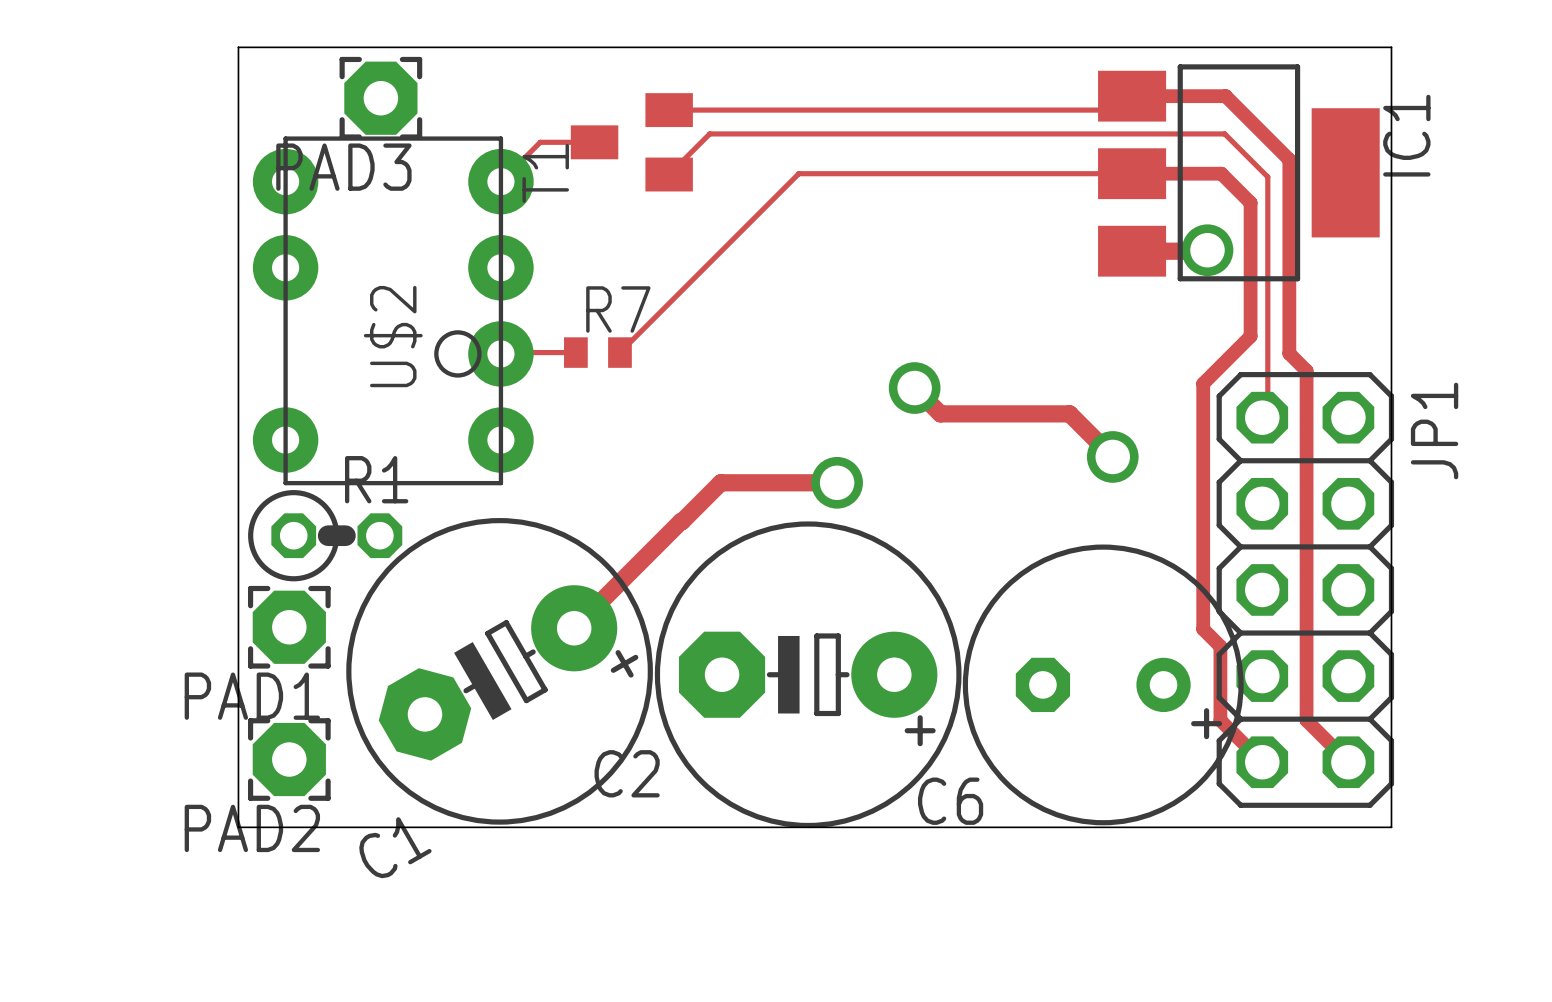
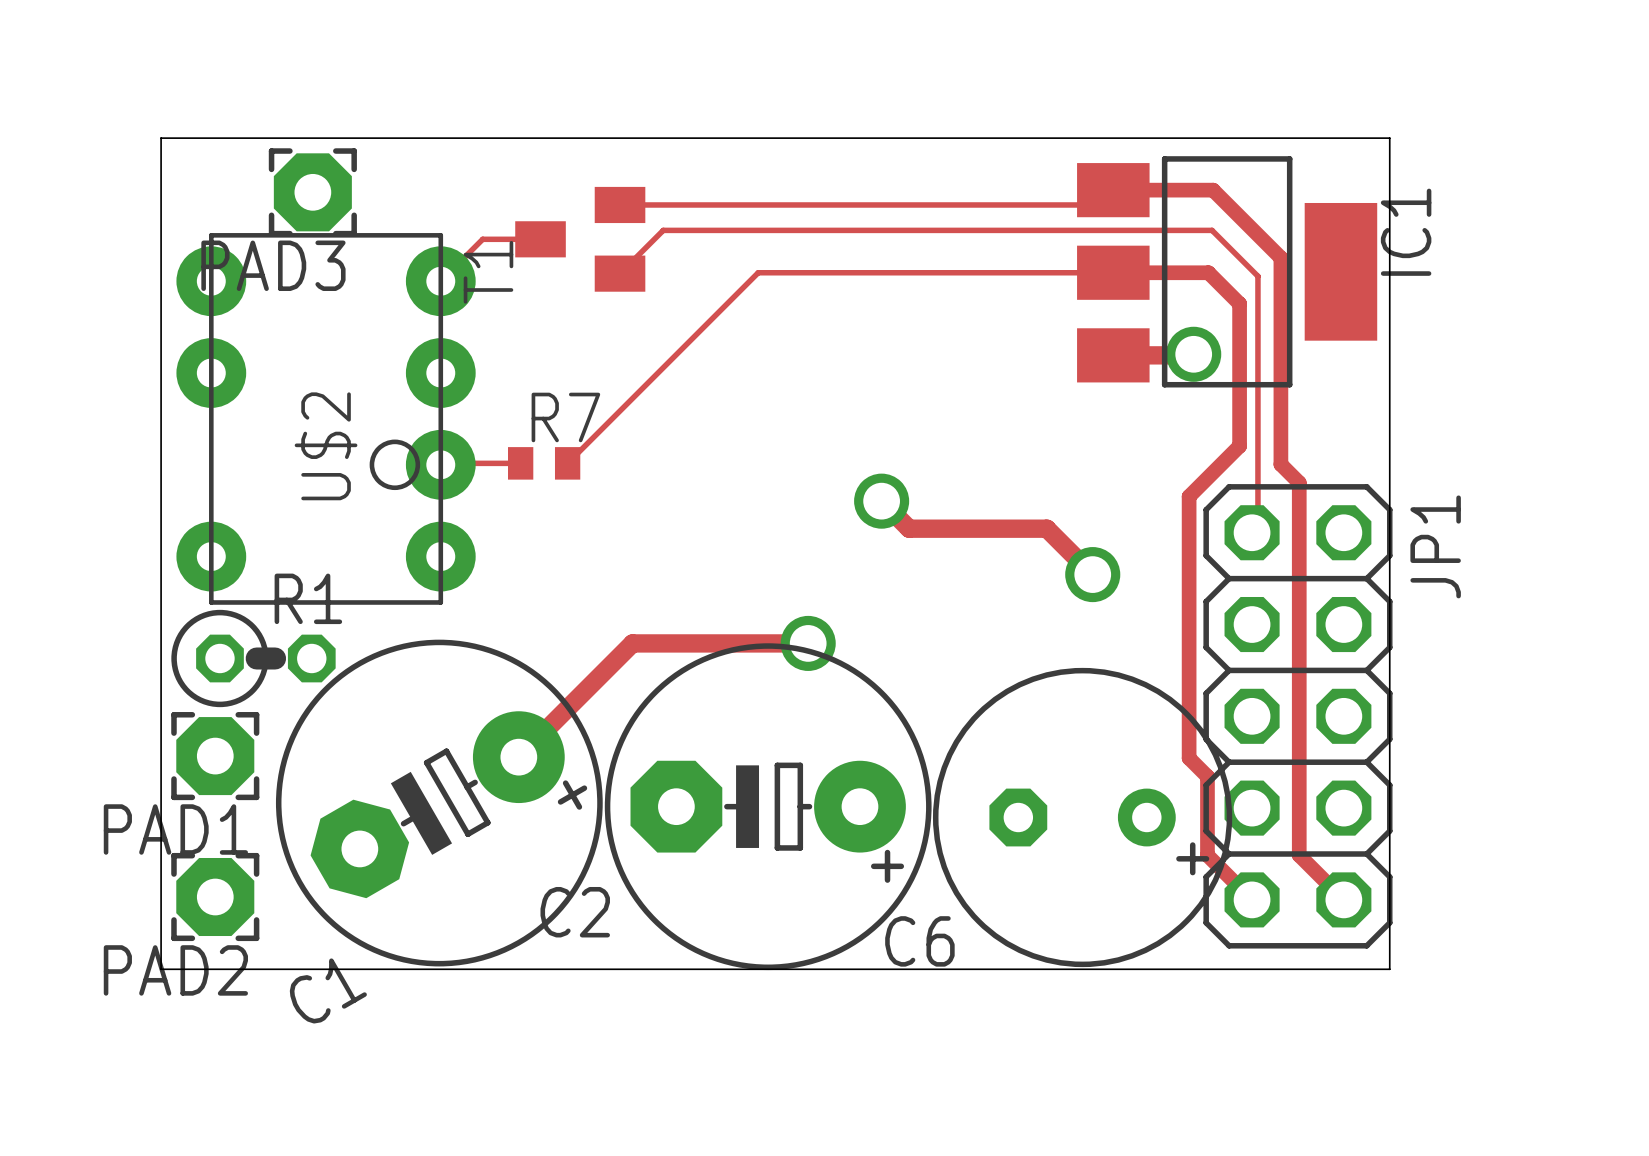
track: (837, 482) (720, 482) (682, 521) -> (808, 643) (633, 643)
via position: (837, 482) -> (808, 643)

